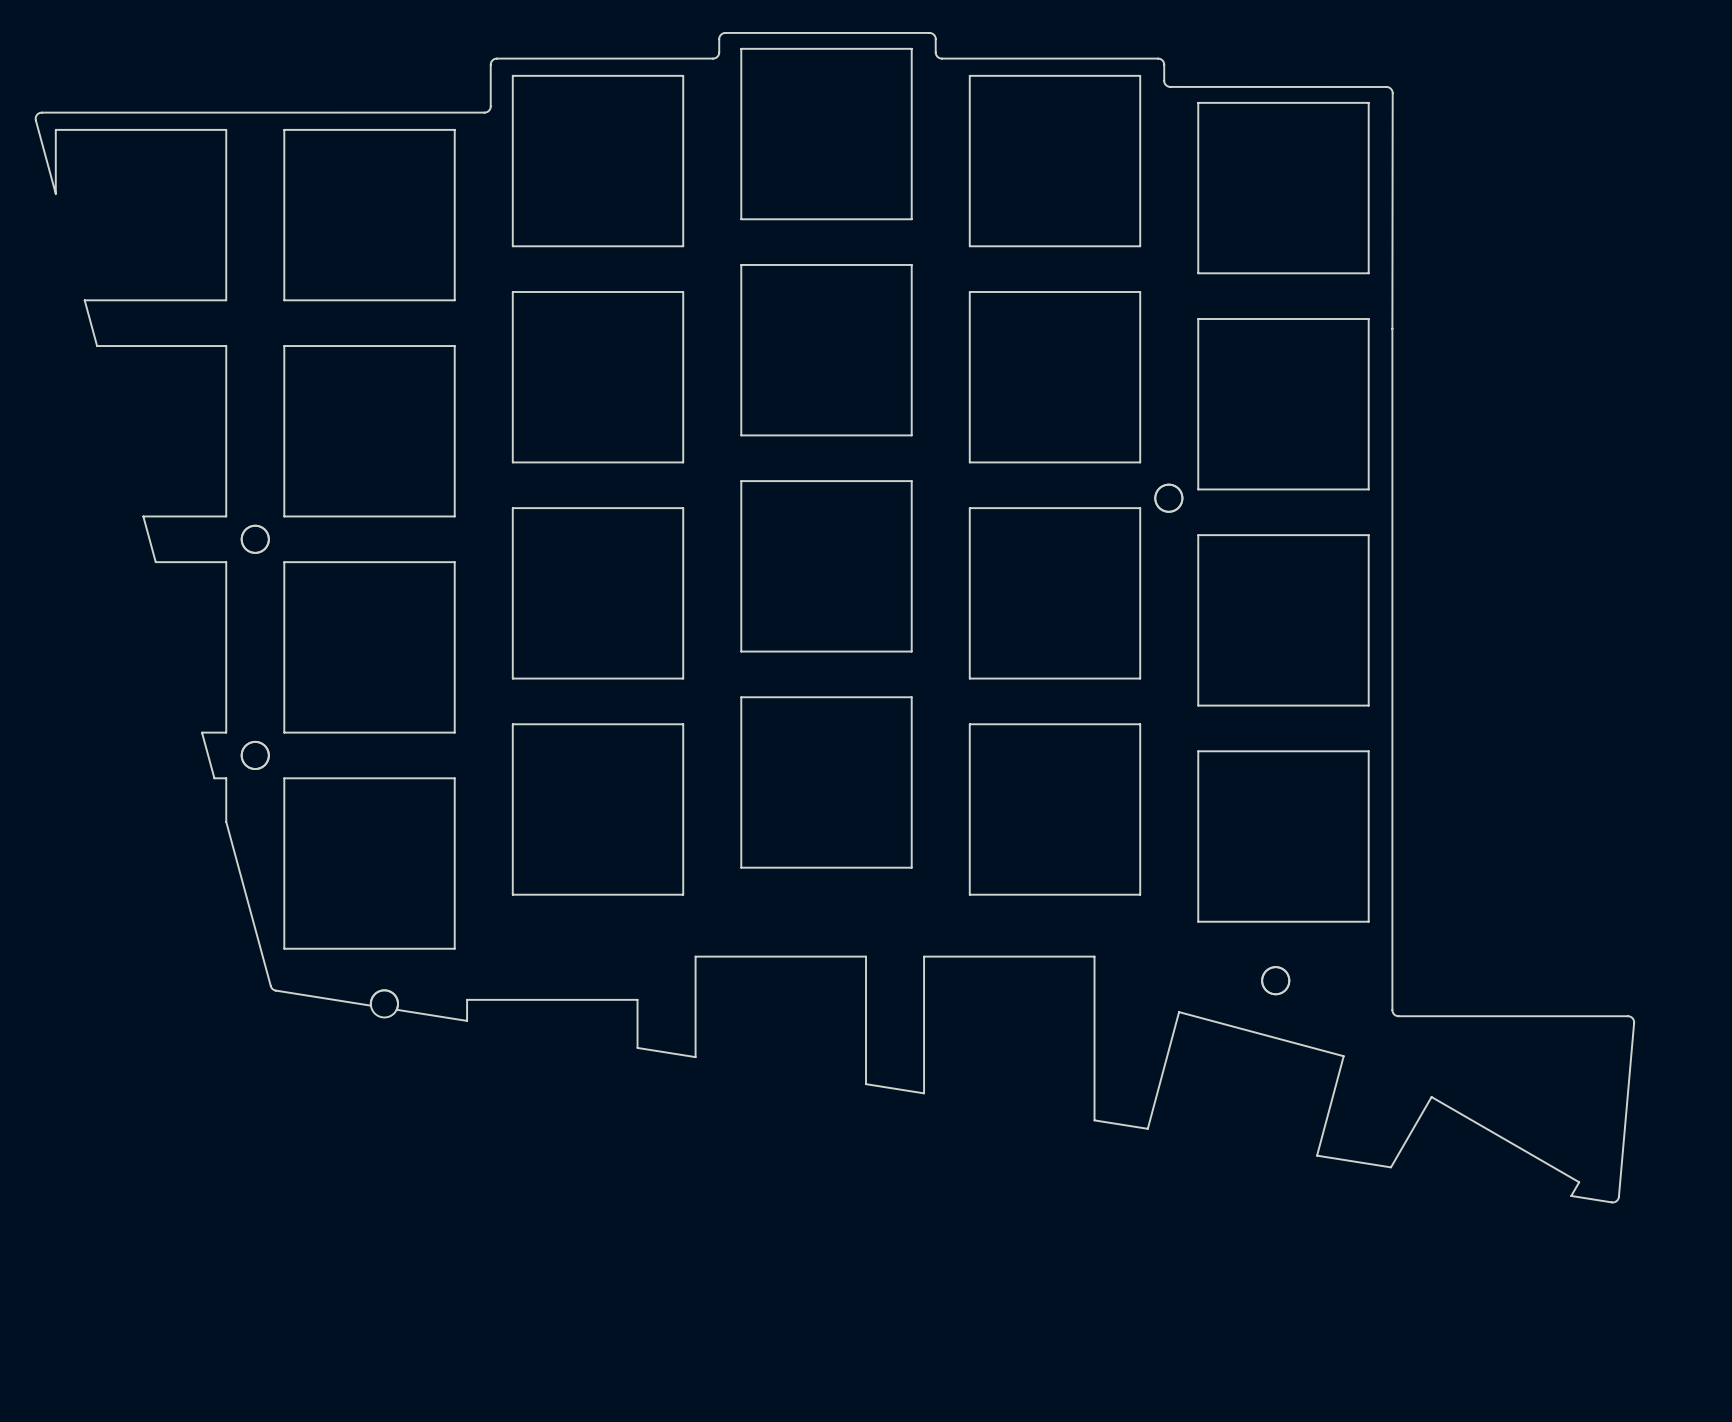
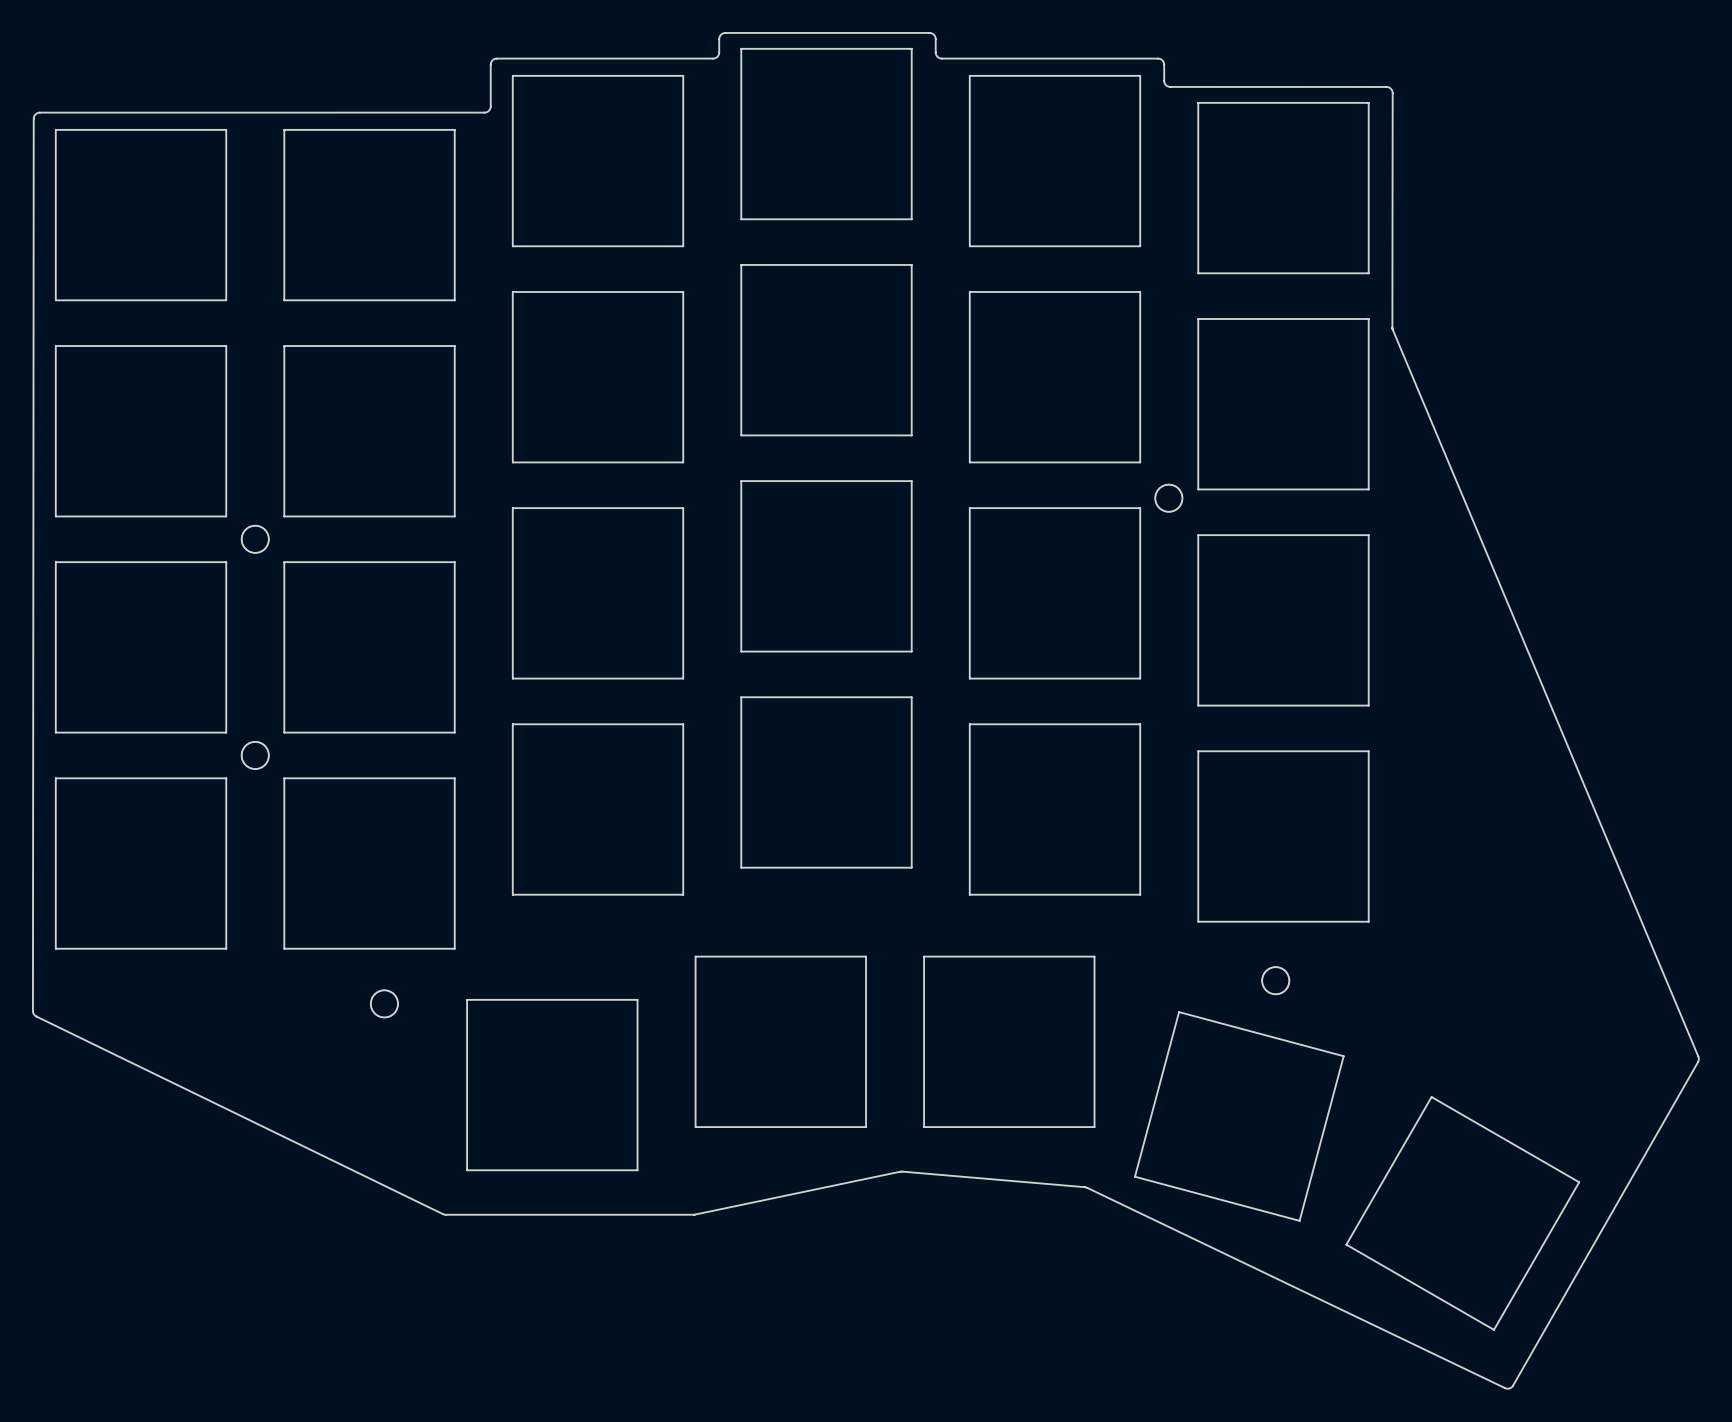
board edge: (41, 112) (37, 114) (35, 119) (55, 193) -> (41, 112) (36, 113) (33, 118) (32, 1010) (35, 1015) (444, 1214) (694, 1214) (901, 1171) (1085, 1187) (1508, 1388) (1513, 1385) (1698, 1058) (1392, 327)
board edge: (84, 300) (97, 346) -> (84, 300) (55, 300) (55, 193)
board edge: (1392, 328) (1392, 1011) (1398, 1016) (1627, 1016) (1632, 1018) (1634, 1022) (1618, 1198) (1612, 1202) (1571, 1195) -> none
board edge: (143, 516) (155, 562) -> (143, 516) (55, 516) (55, 346) (97, 346)
board edge: none -> (155, 562) (55, 562) (55, 732) (202, 732)
board edge: (202, 732) (214, 778) -> (226, 821) (226, 948) (55, 948) (55, 778) (214, 778)
board edge: (226, 821) (272, 989) (370, 1005) (374, 994) (379, 991) (386, 990) (396, 996) (397, 1003) (396, 1009) (467, 1020) -> none
round board edge: none -> [369, 989, 399, 1019]
board edge: (637, 1047) (695, 1057) -> (637, 1047) (637, 1170) (467, 1170) (467, 1020)
board edge: (866, 1084) (924, 1093) -> (866, 1084) (866, 1127) (695, 1127) (695, 1057)
board edge: none -> (924, 1093) (924, 1127) (1094, 1127) (1094, 1120)
board edge: (1094, 1120) (1147, 1128) -> (1317, 1155) (1299, 1220) (1134, 1176) (1147, 1128)
board edge: (1317, 1155) (1390, 1167) -> (1571, 1195) (1493, 1329) (1346, 1244) (1390, 1167)

